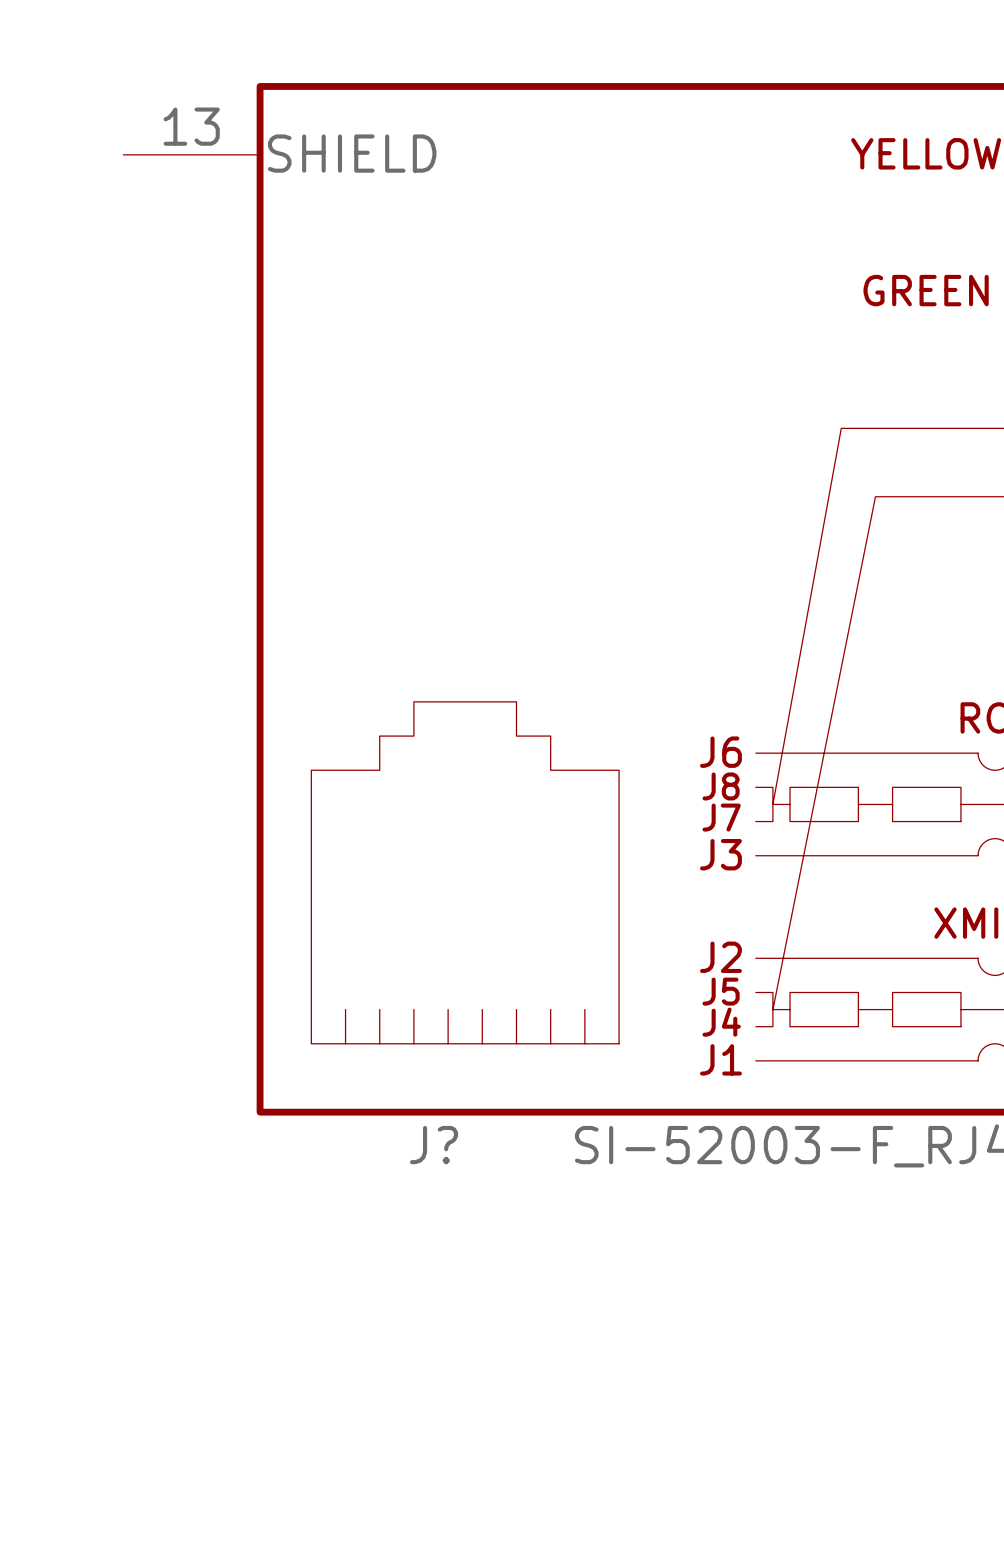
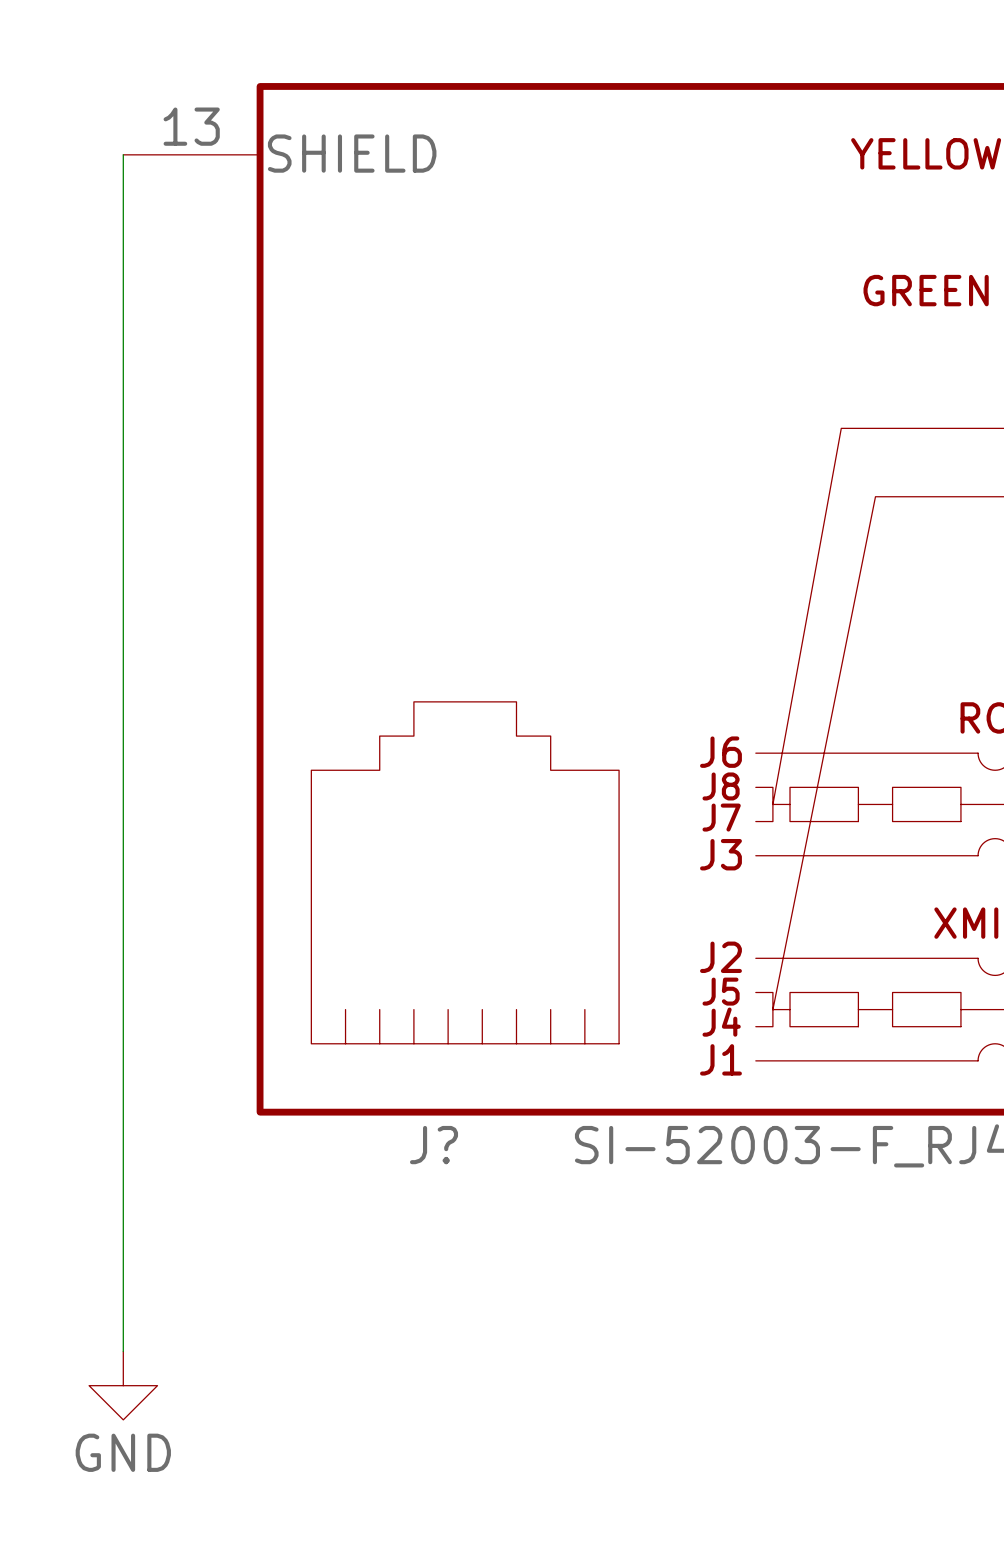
wire: none -> (123, 154) (123, 1351)
power symbol: none -> GND (123, 1385)

